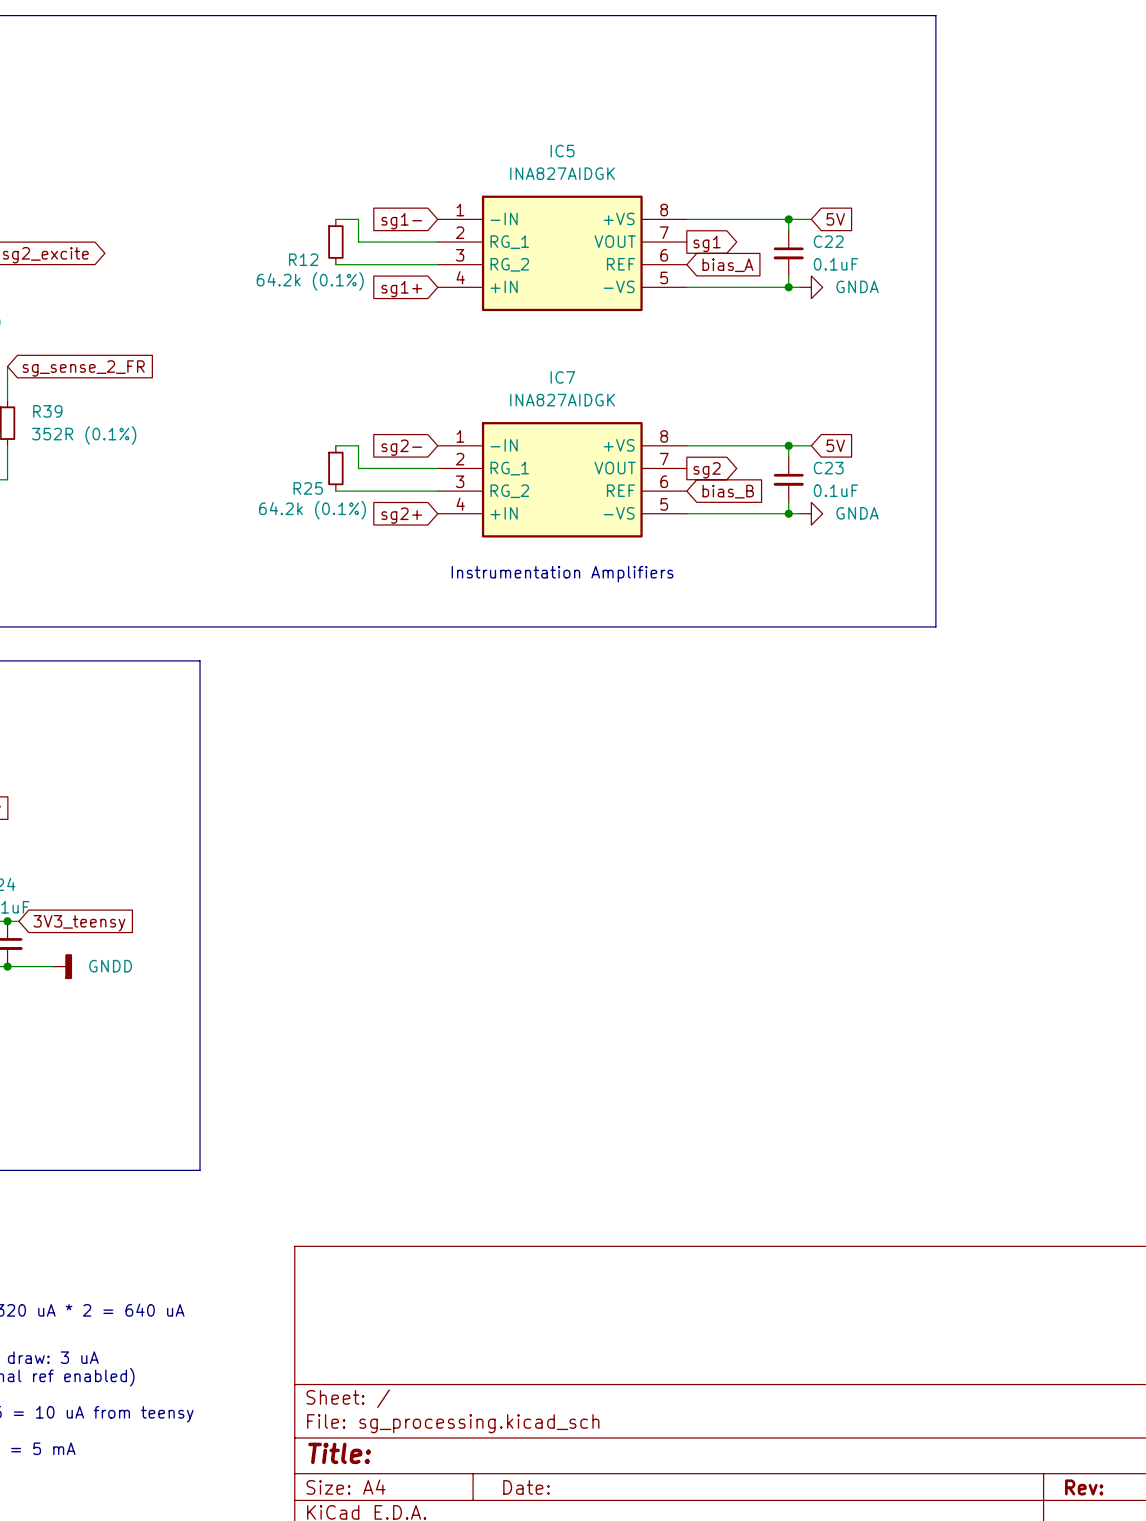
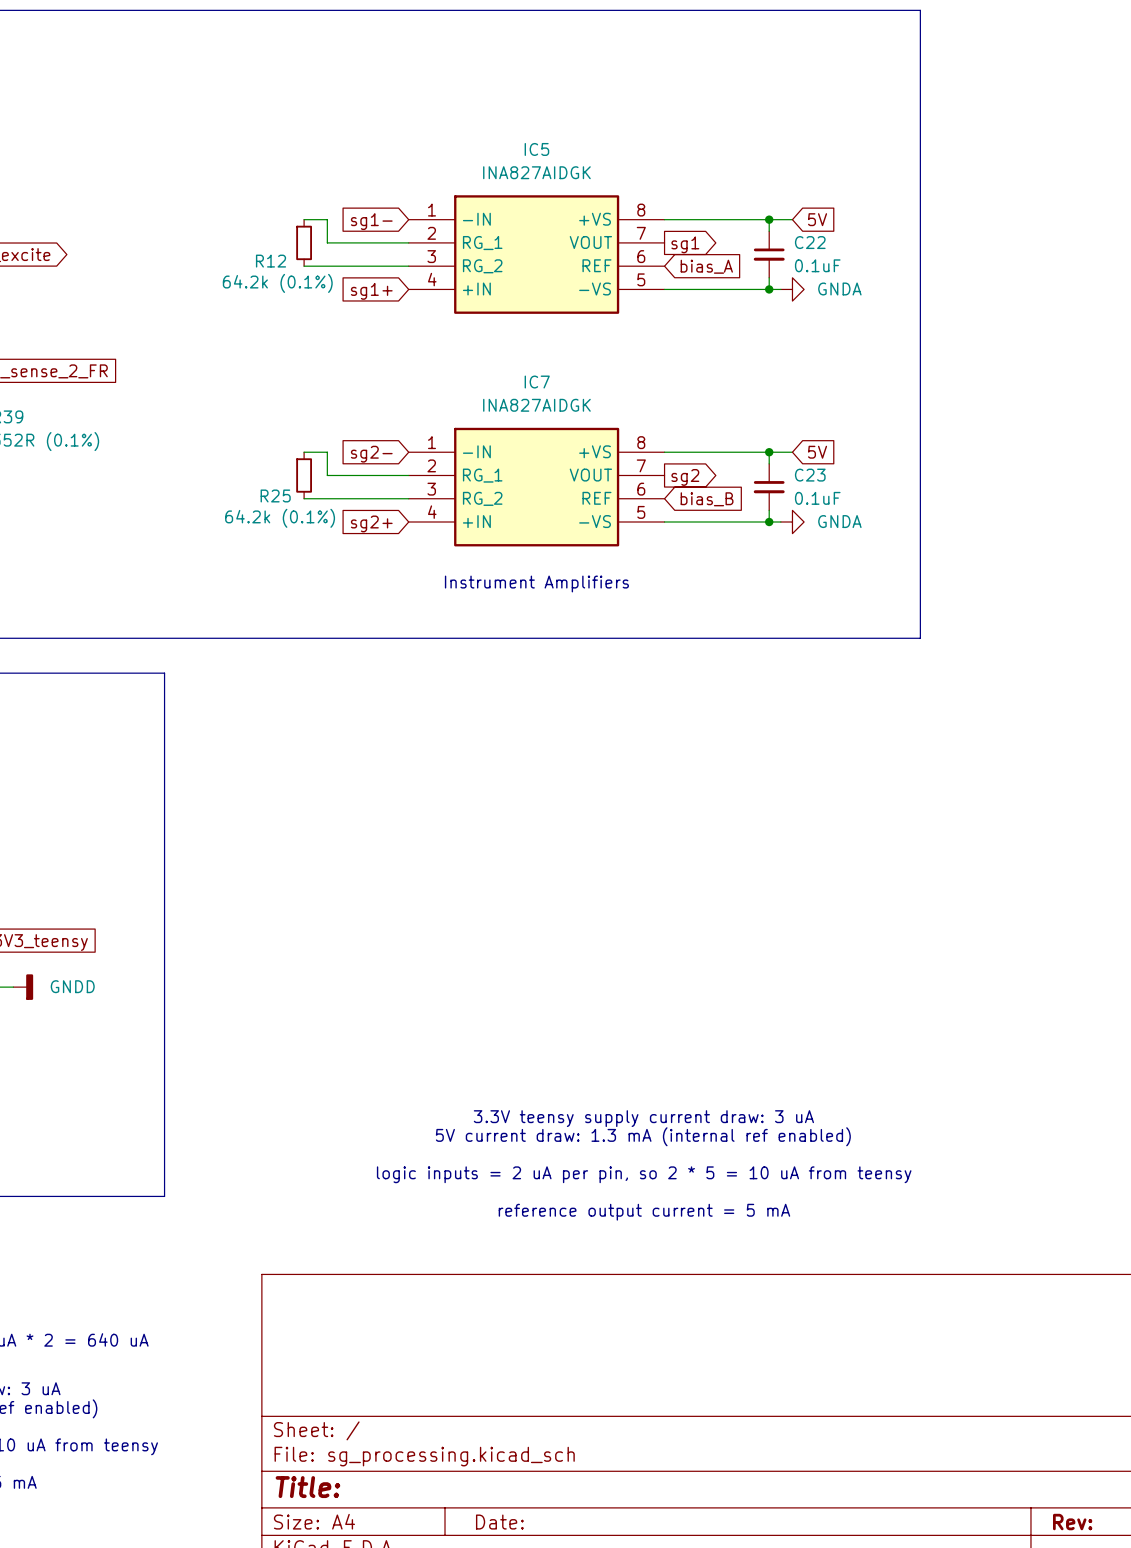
text: Instrumentation Amplifiers (562, 574) -> Instrument Amplifiers (536, 584)
text: none -> 3.3V teensy supply current draw: 3 uA (643, 1118)
text: none -> 5V current draw: 1.3 mA (internal ref enabled) (643, 1136)
text: none -> logic inputs = 2 uA per pin, so 2 * 5 = 10 uA from teensy (644, 1174)
text: none -> reference output current = 5 mA (644, 1212)

